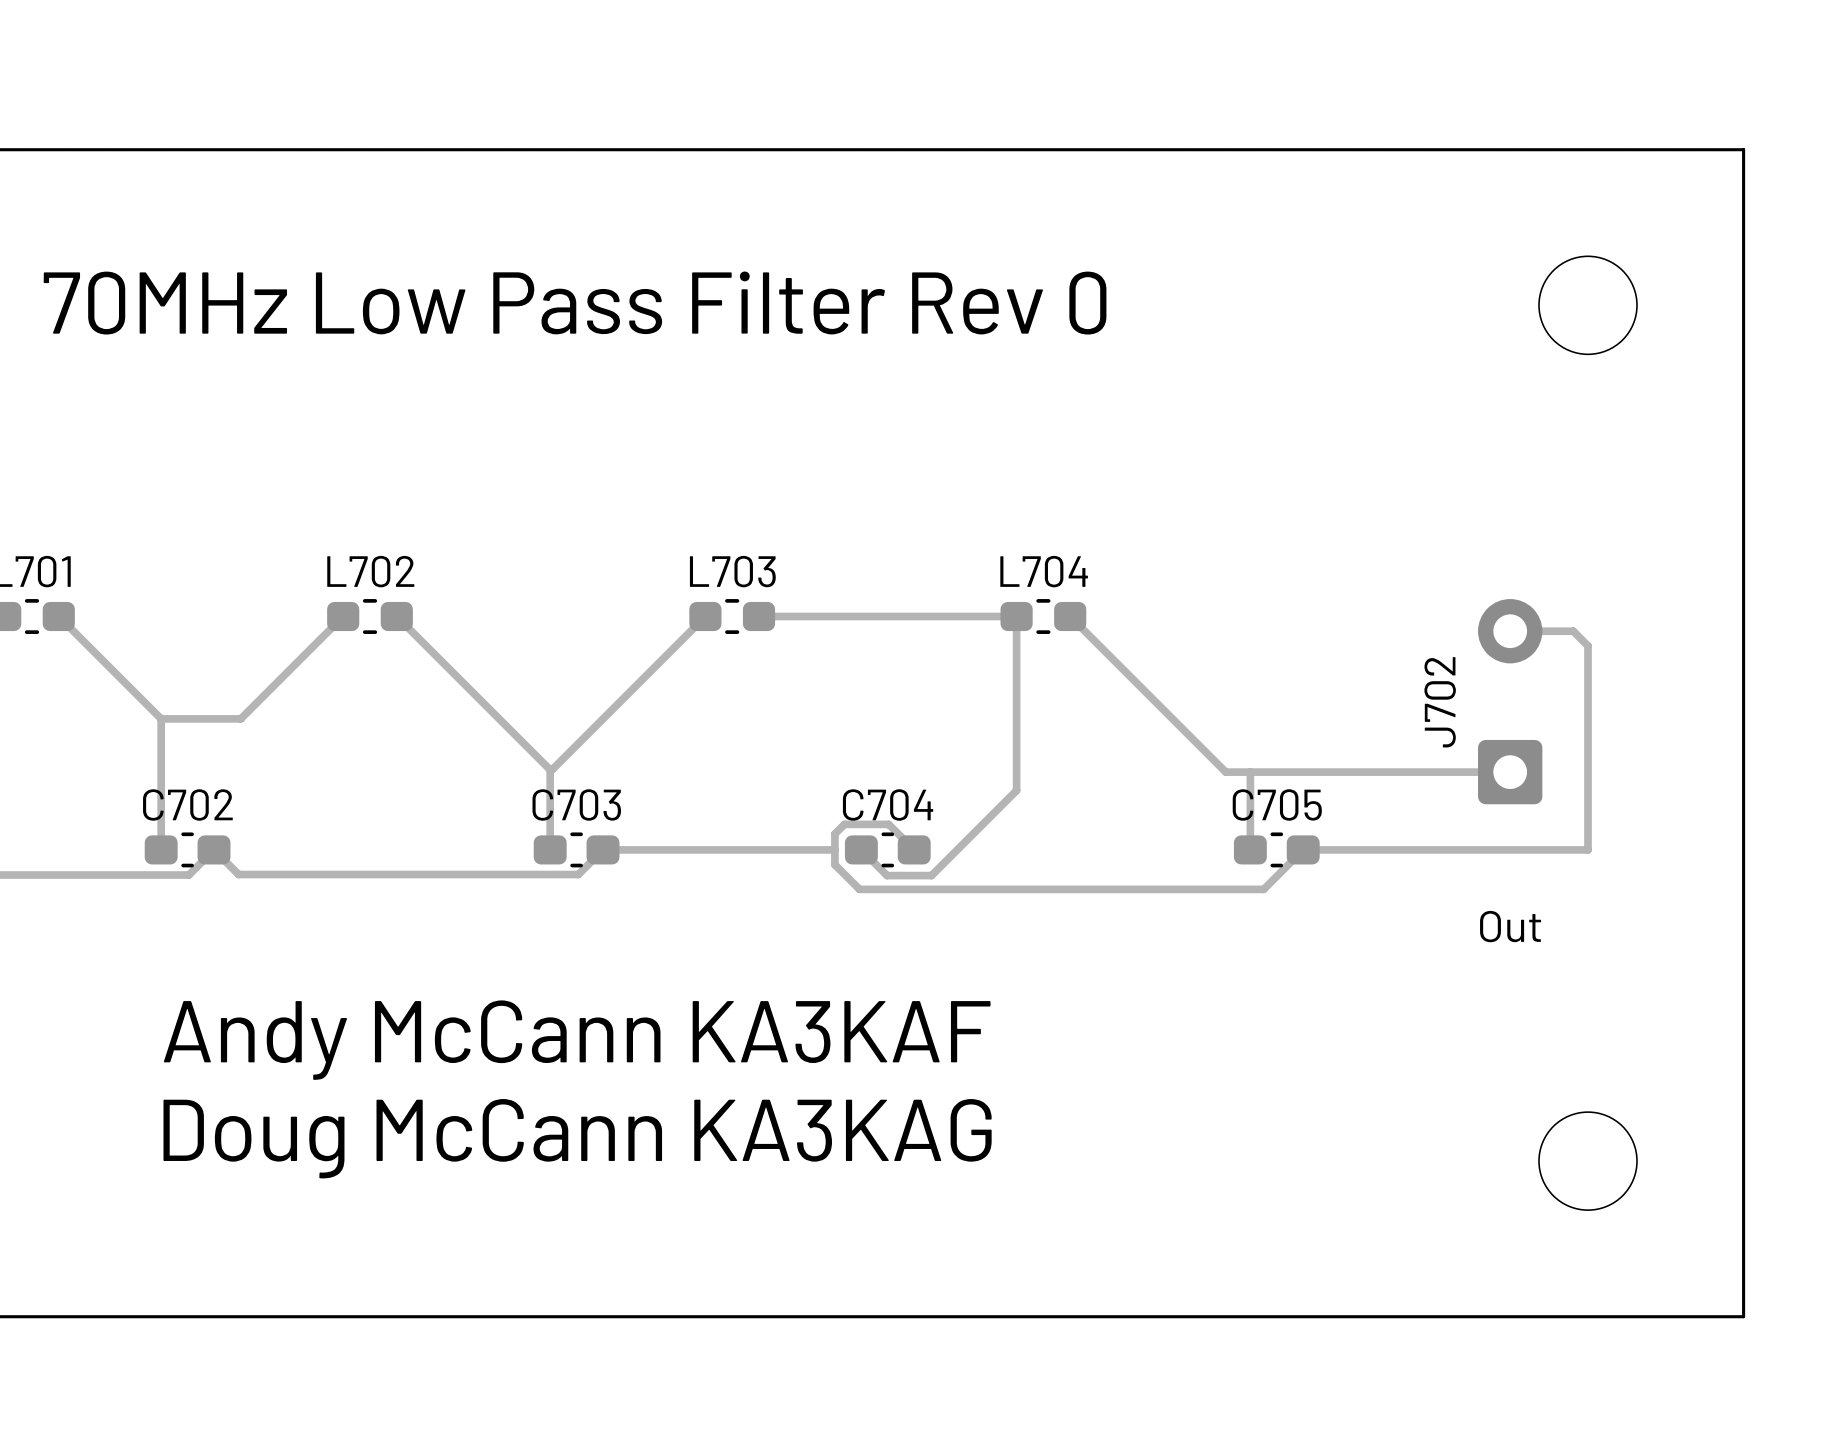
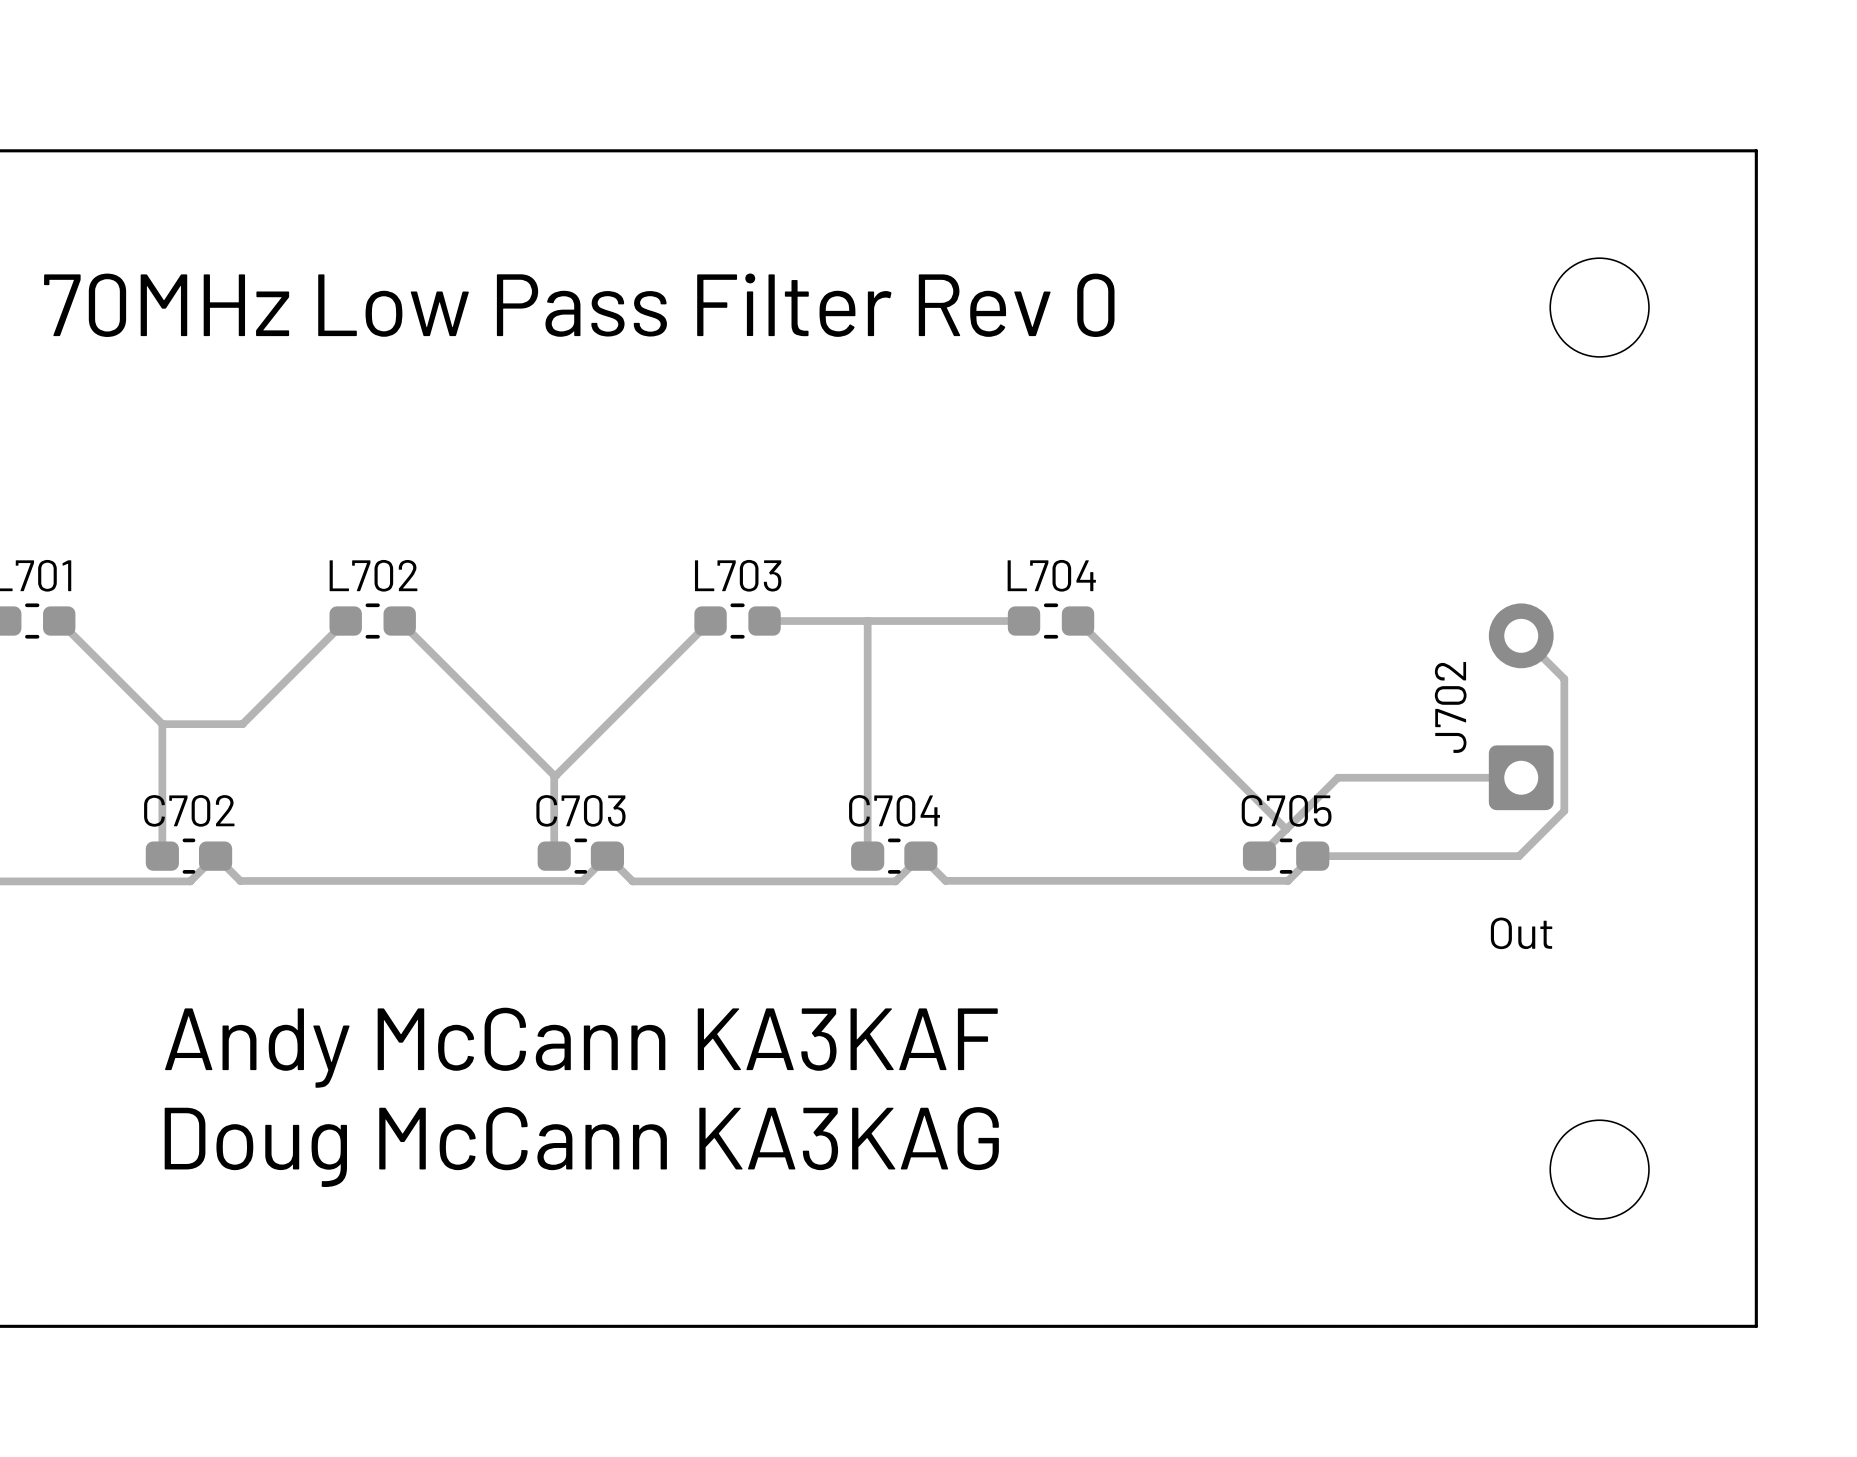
track: (1016, 616) (1016, 790) (931, 875) (887, 875) (861, 849) -> (867, 621) (867, 856)
track: (1510, 631) (1573, 631) (1588, 645) (1588, 849) (1508, 849) -> (1521, 635) (1564, 678) (1564, 810) (1519, 856)
track: (1225, 772) (1328, 772) -> (1234, 777) (1286, 829)
track: (1250, 772) (1250, 849) -> (1337, 777) (1259, 856)
track: (603, 849) (834, 849) -> none
track: (914, 849) (888, 824) (844, 824) (834, 833) (834, 864) (859, 889) (1263, 889) (1278, 874) -> (607, 856) (632, 881) (895, 881) (920, 856) (945, 880) (1288, 880)

